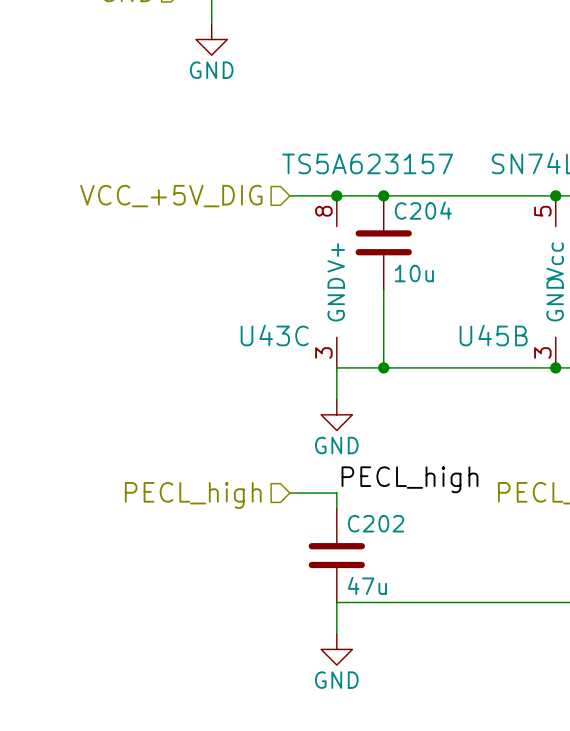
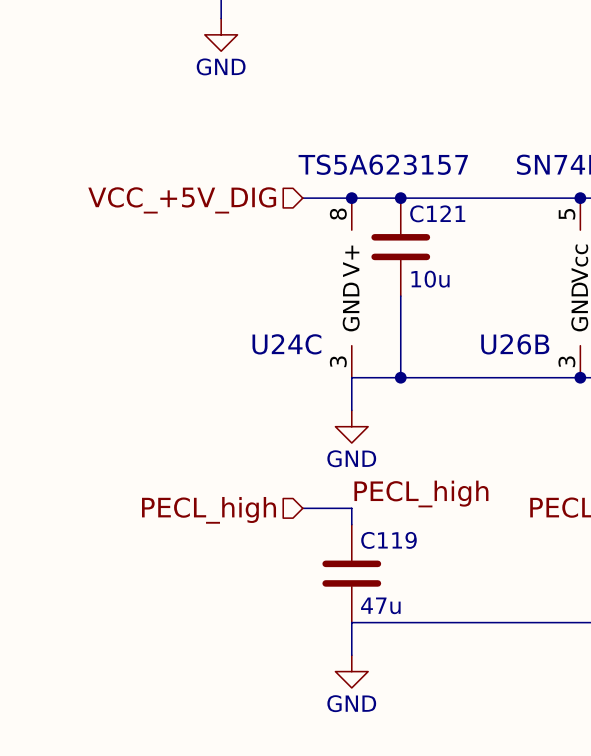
C204 name: C204 (423, 210) -> C121 (437, 213)
U43C name: U43C (274, 335) -> U24C (286, 344)
U45B name: U45B (493, 335) -> U26B (515, 344)
C202 name: C202 (376, 523) -> C119 (388, 540)

